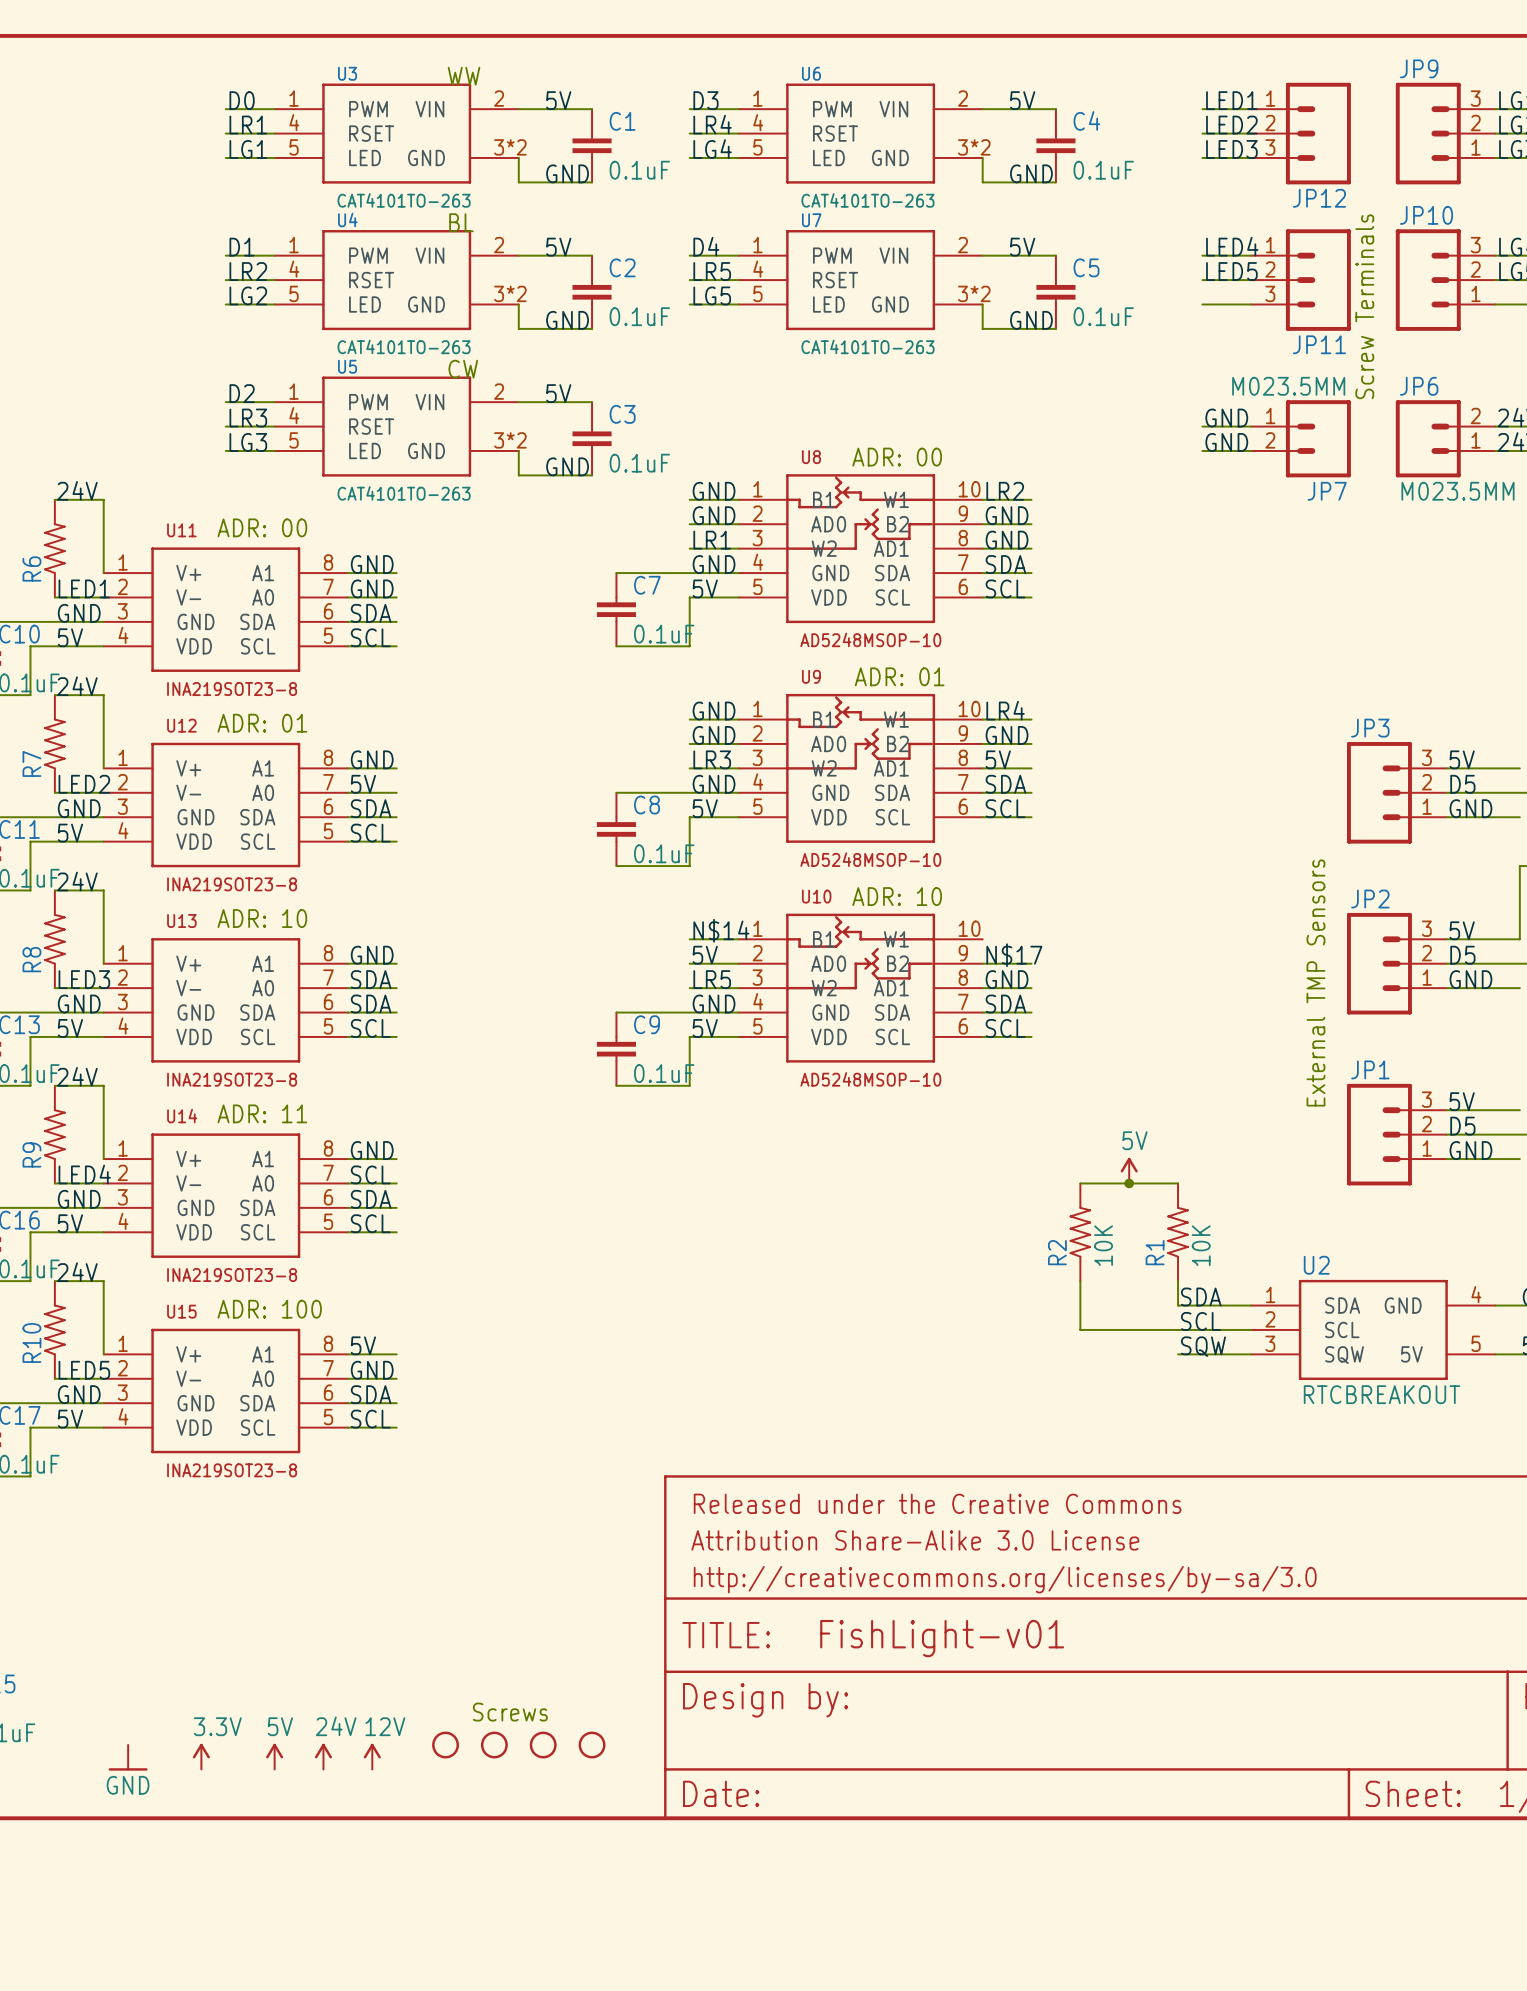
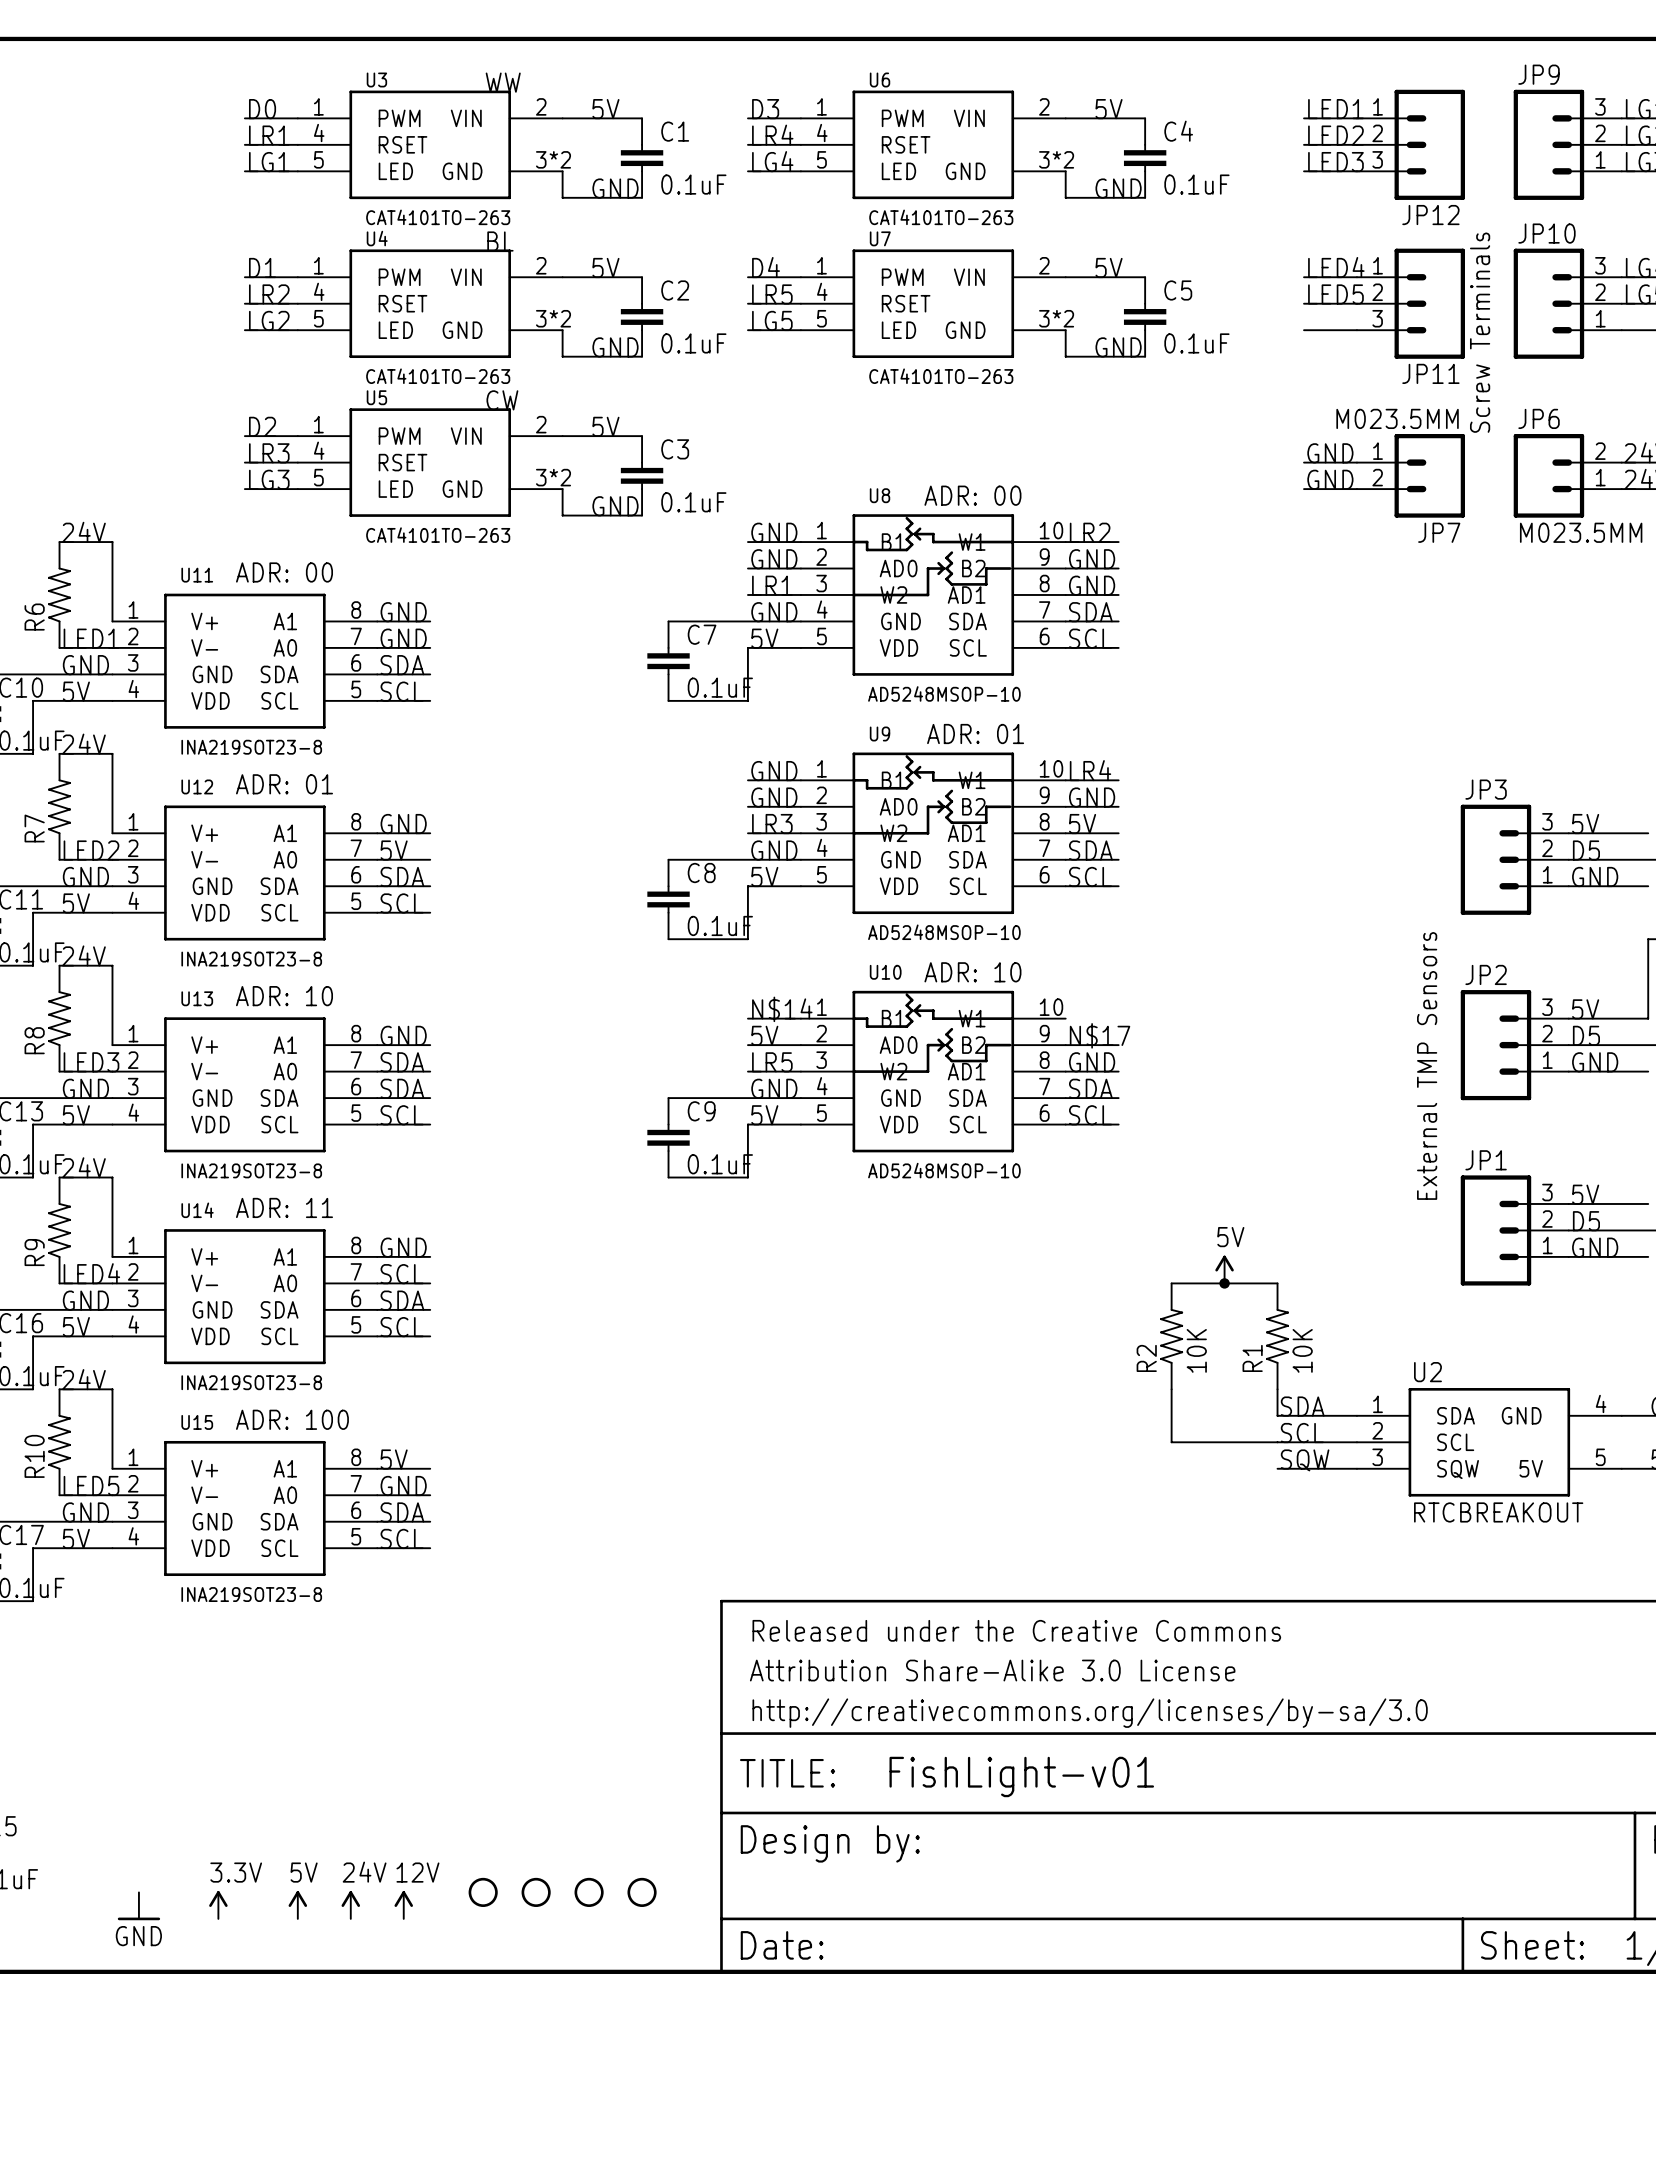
text: Screws (510, 1712) -> none

